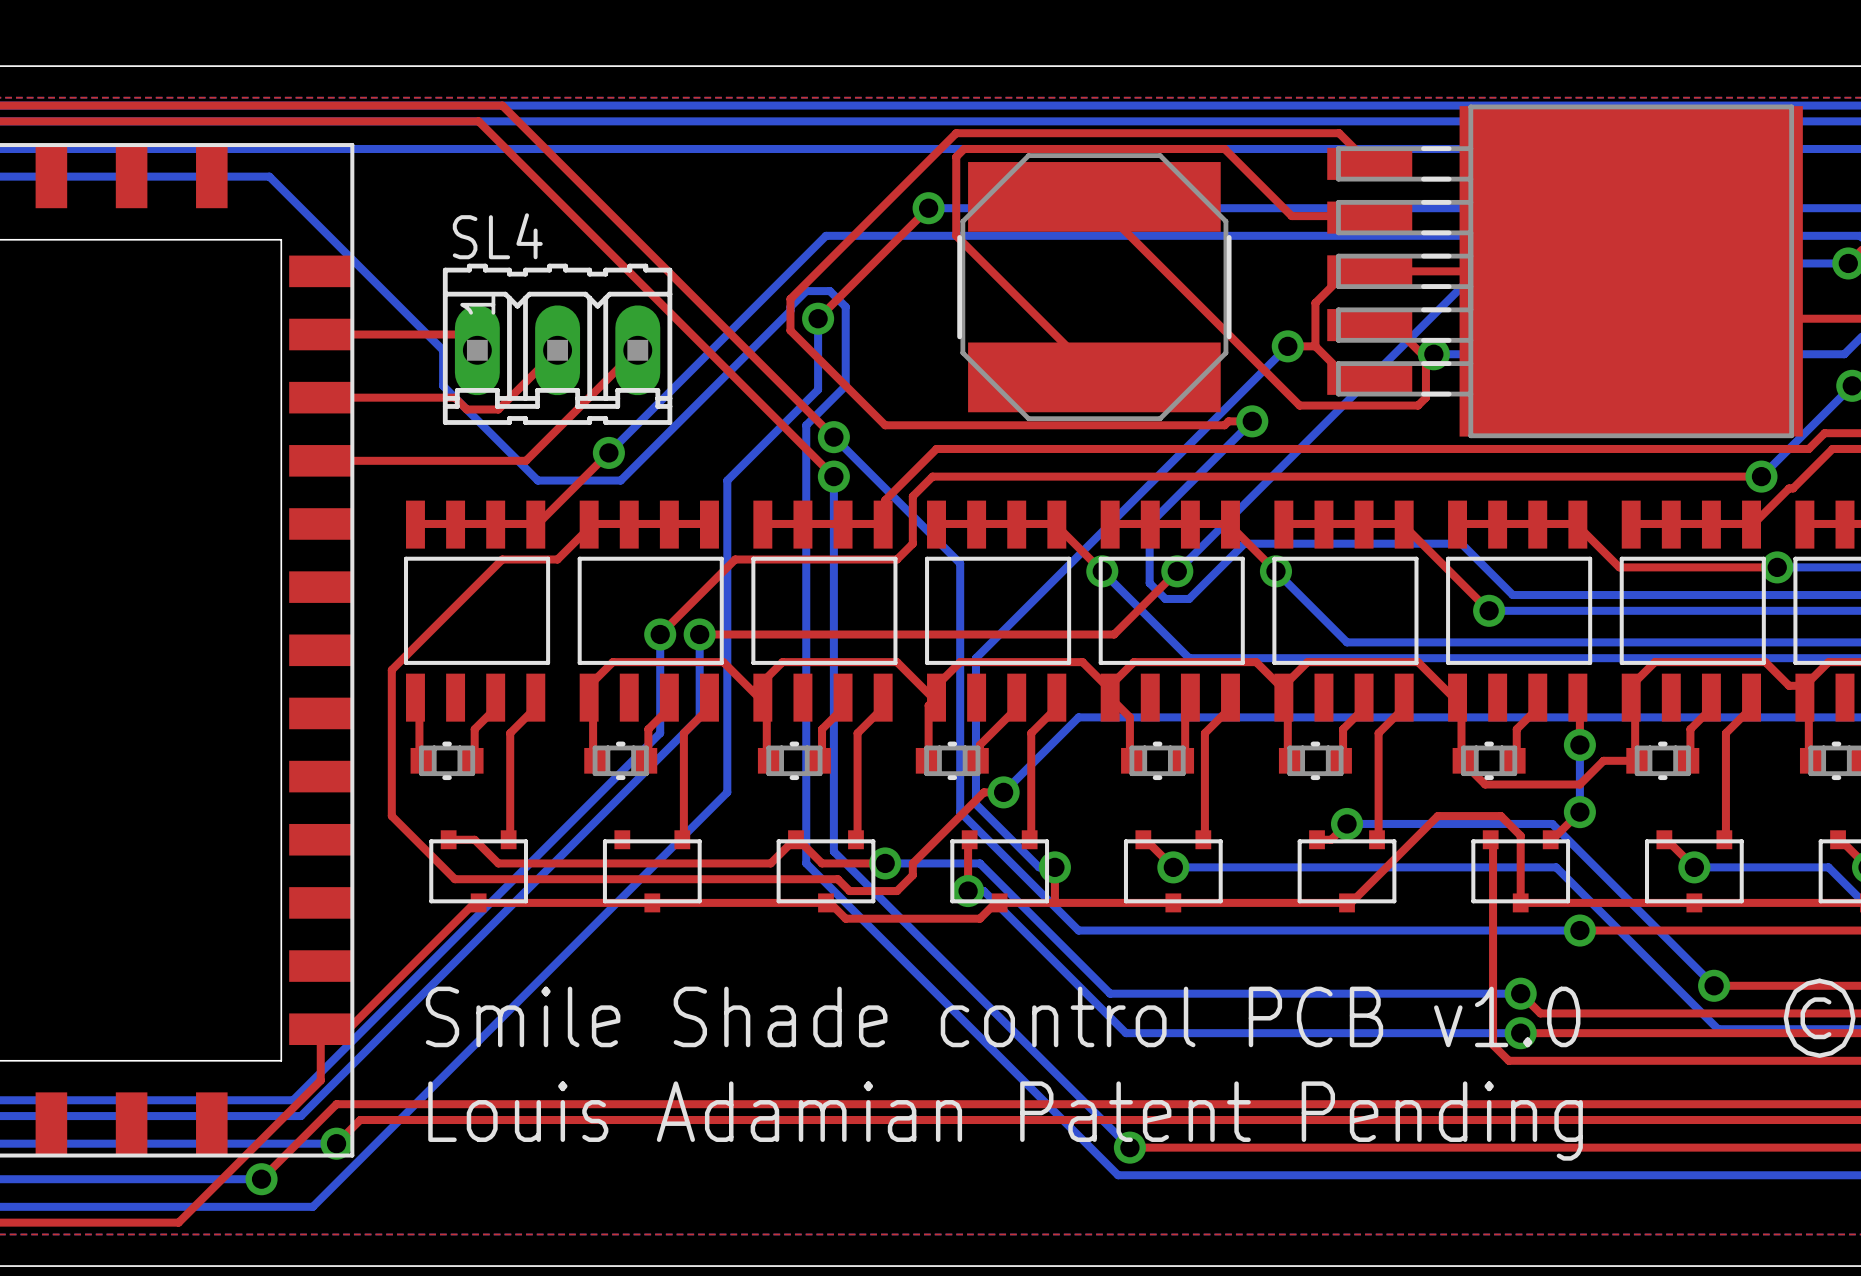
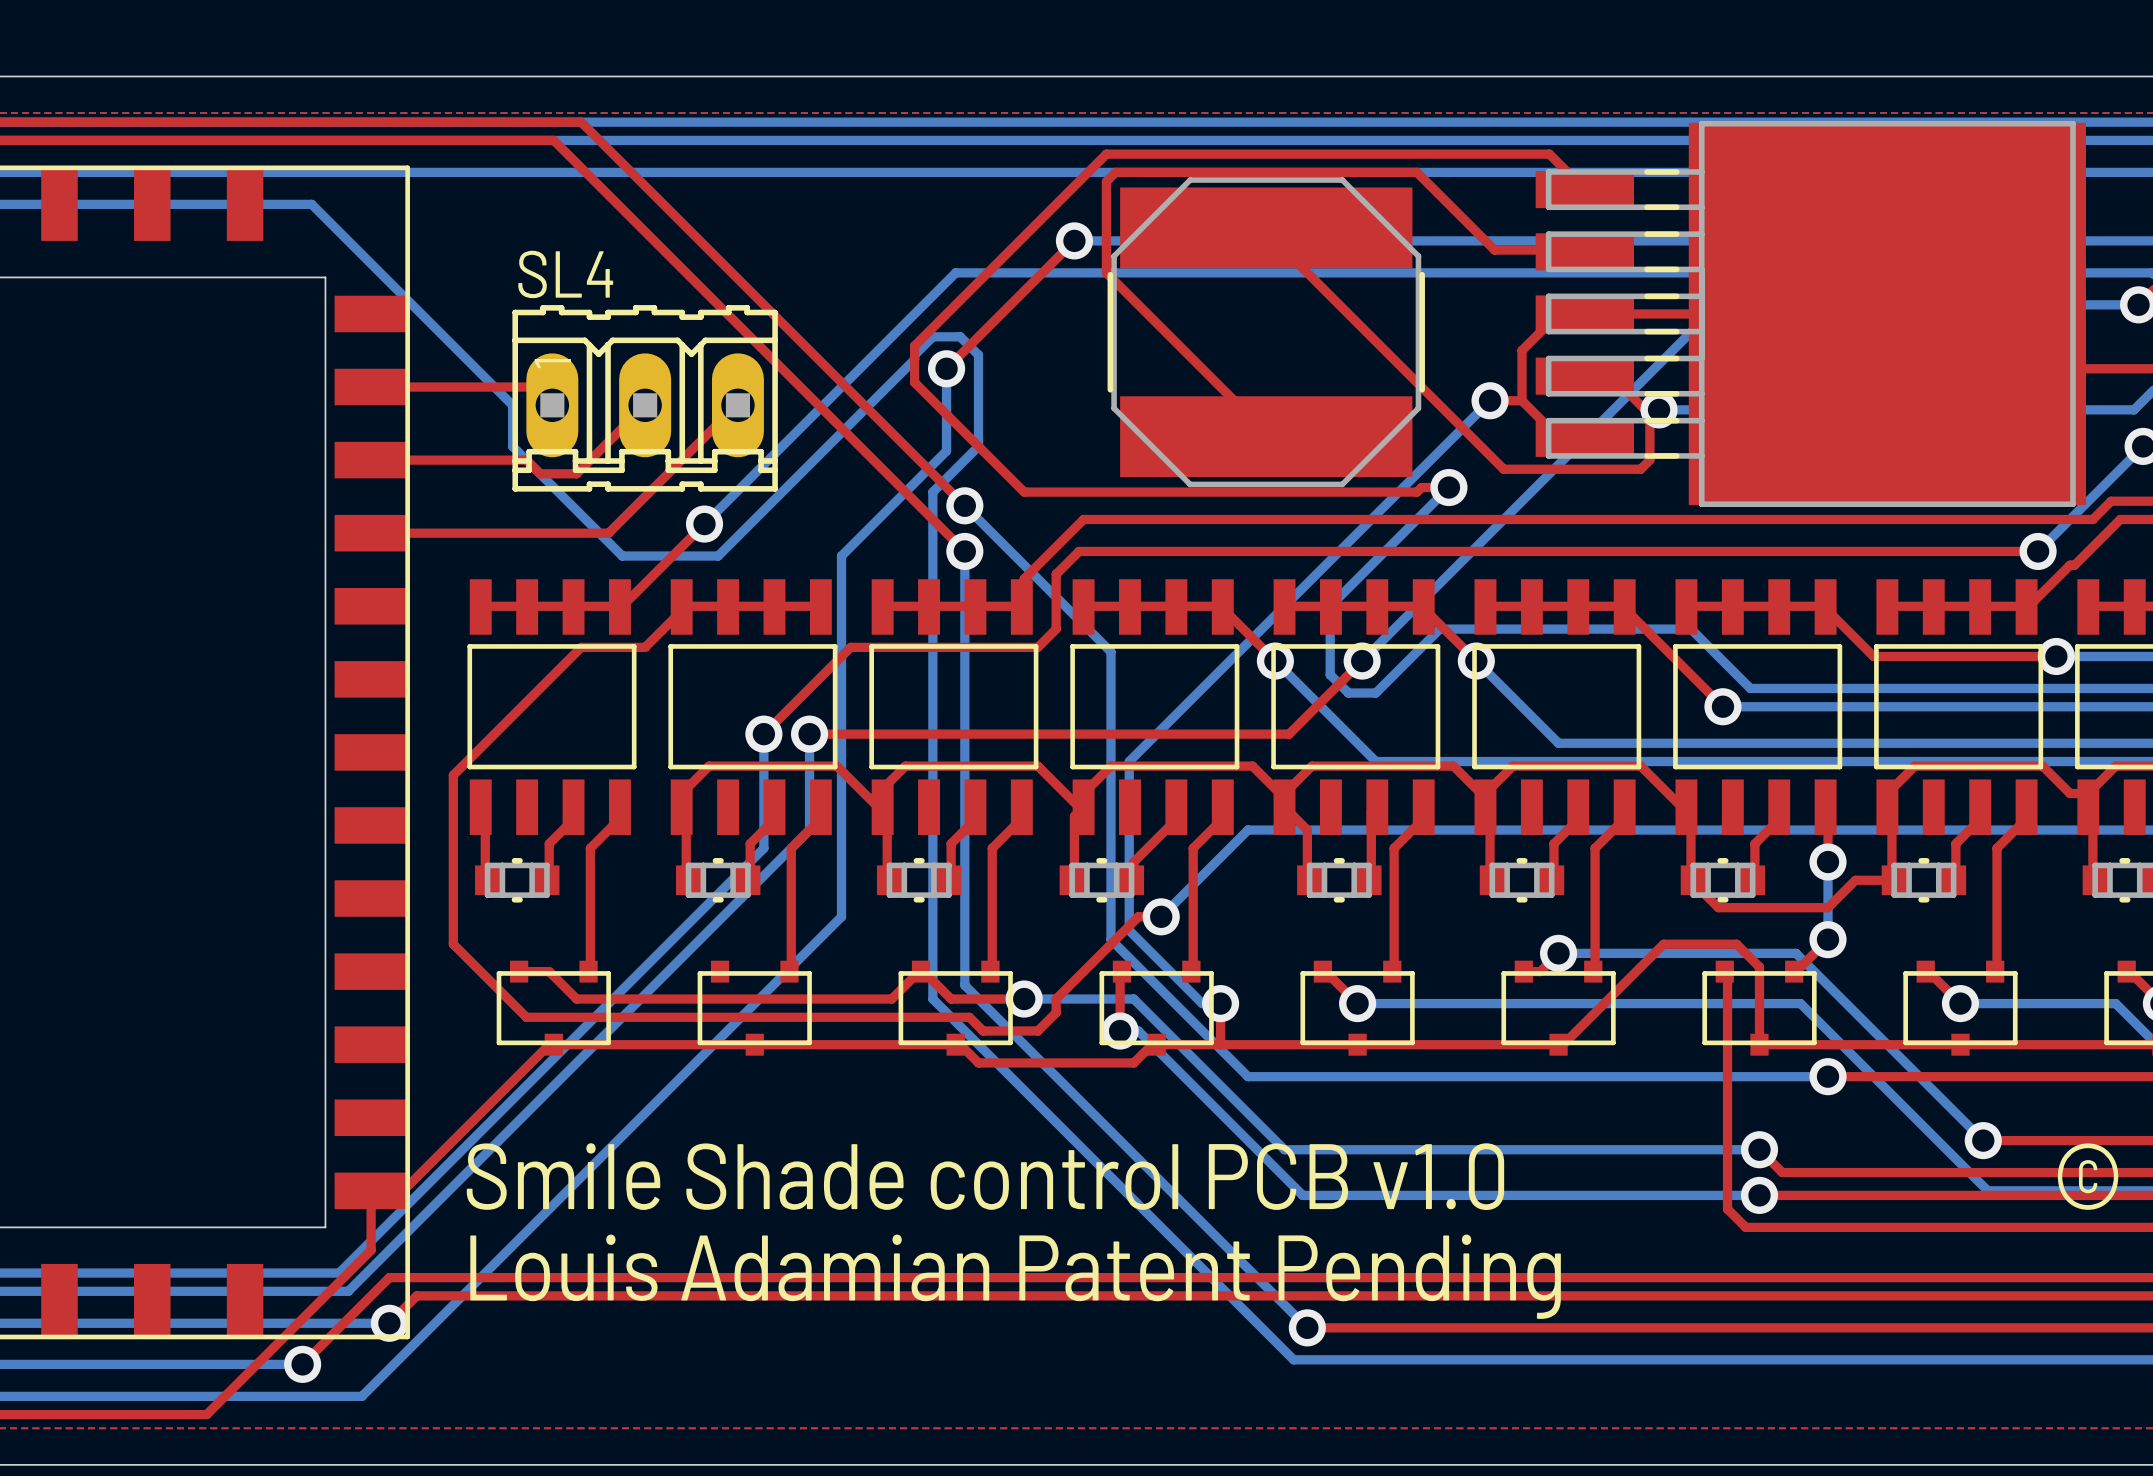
text position: Smile Shade control PCB v1.0 (1003, 1016) -> Smile Shade control PCB v1.0 (985, 1176)
text position: Louis Adamian Patent Pending (1005, 1121) -> Louis Adamian Patent Pending (1015, 1276)

